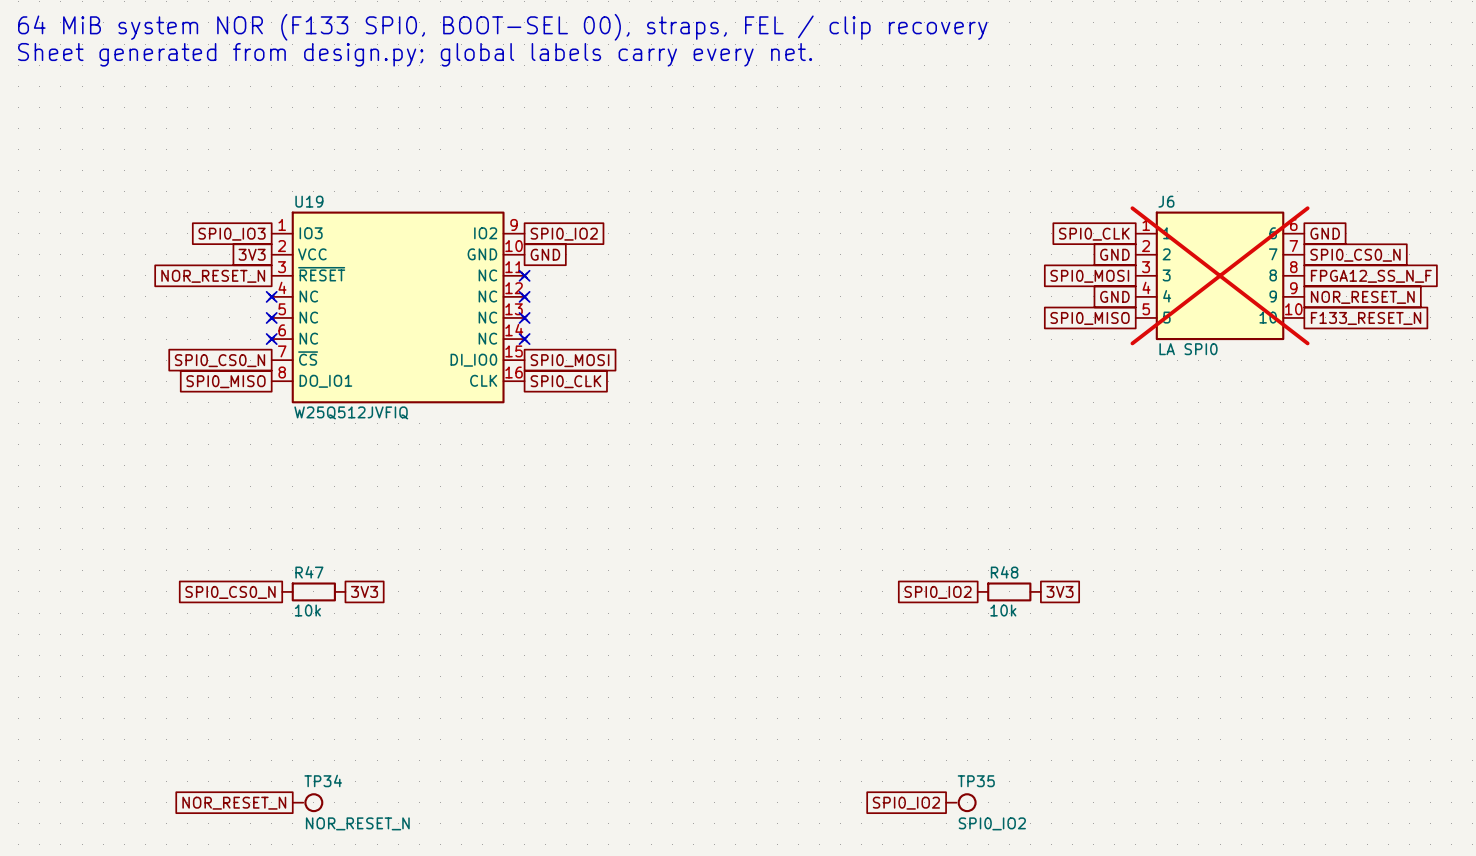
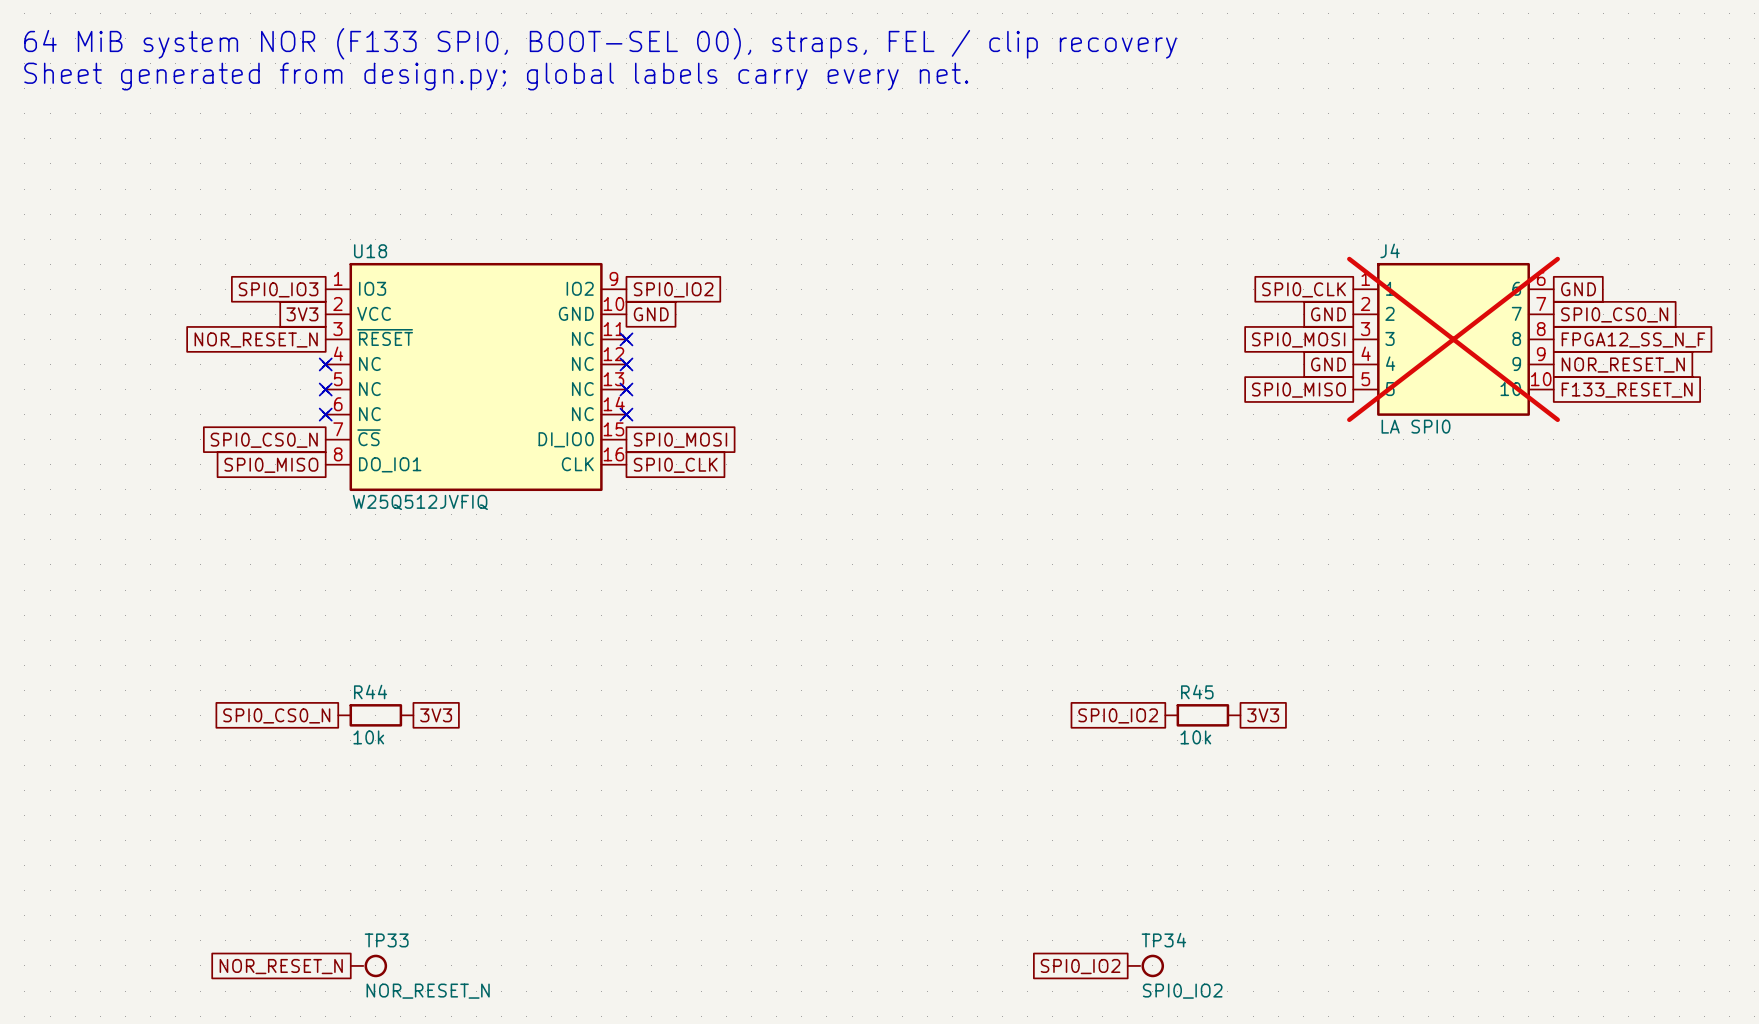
U19 name: U19 (309, 201) -> U18 (370, 251)
J6 name: J6 (1166, 201) -> J4 (1390, 250)
R47 name: R47 (309, 572) -> R44 (370, 692)
R48 name: R48 (1004, 572) -> R45 (1197, 692)
TP34 name: TP34 (323, 780) -> TP33 (386, 940)
TP35 name: TP35 (976, 781) -> TP34 (1163, 940)

